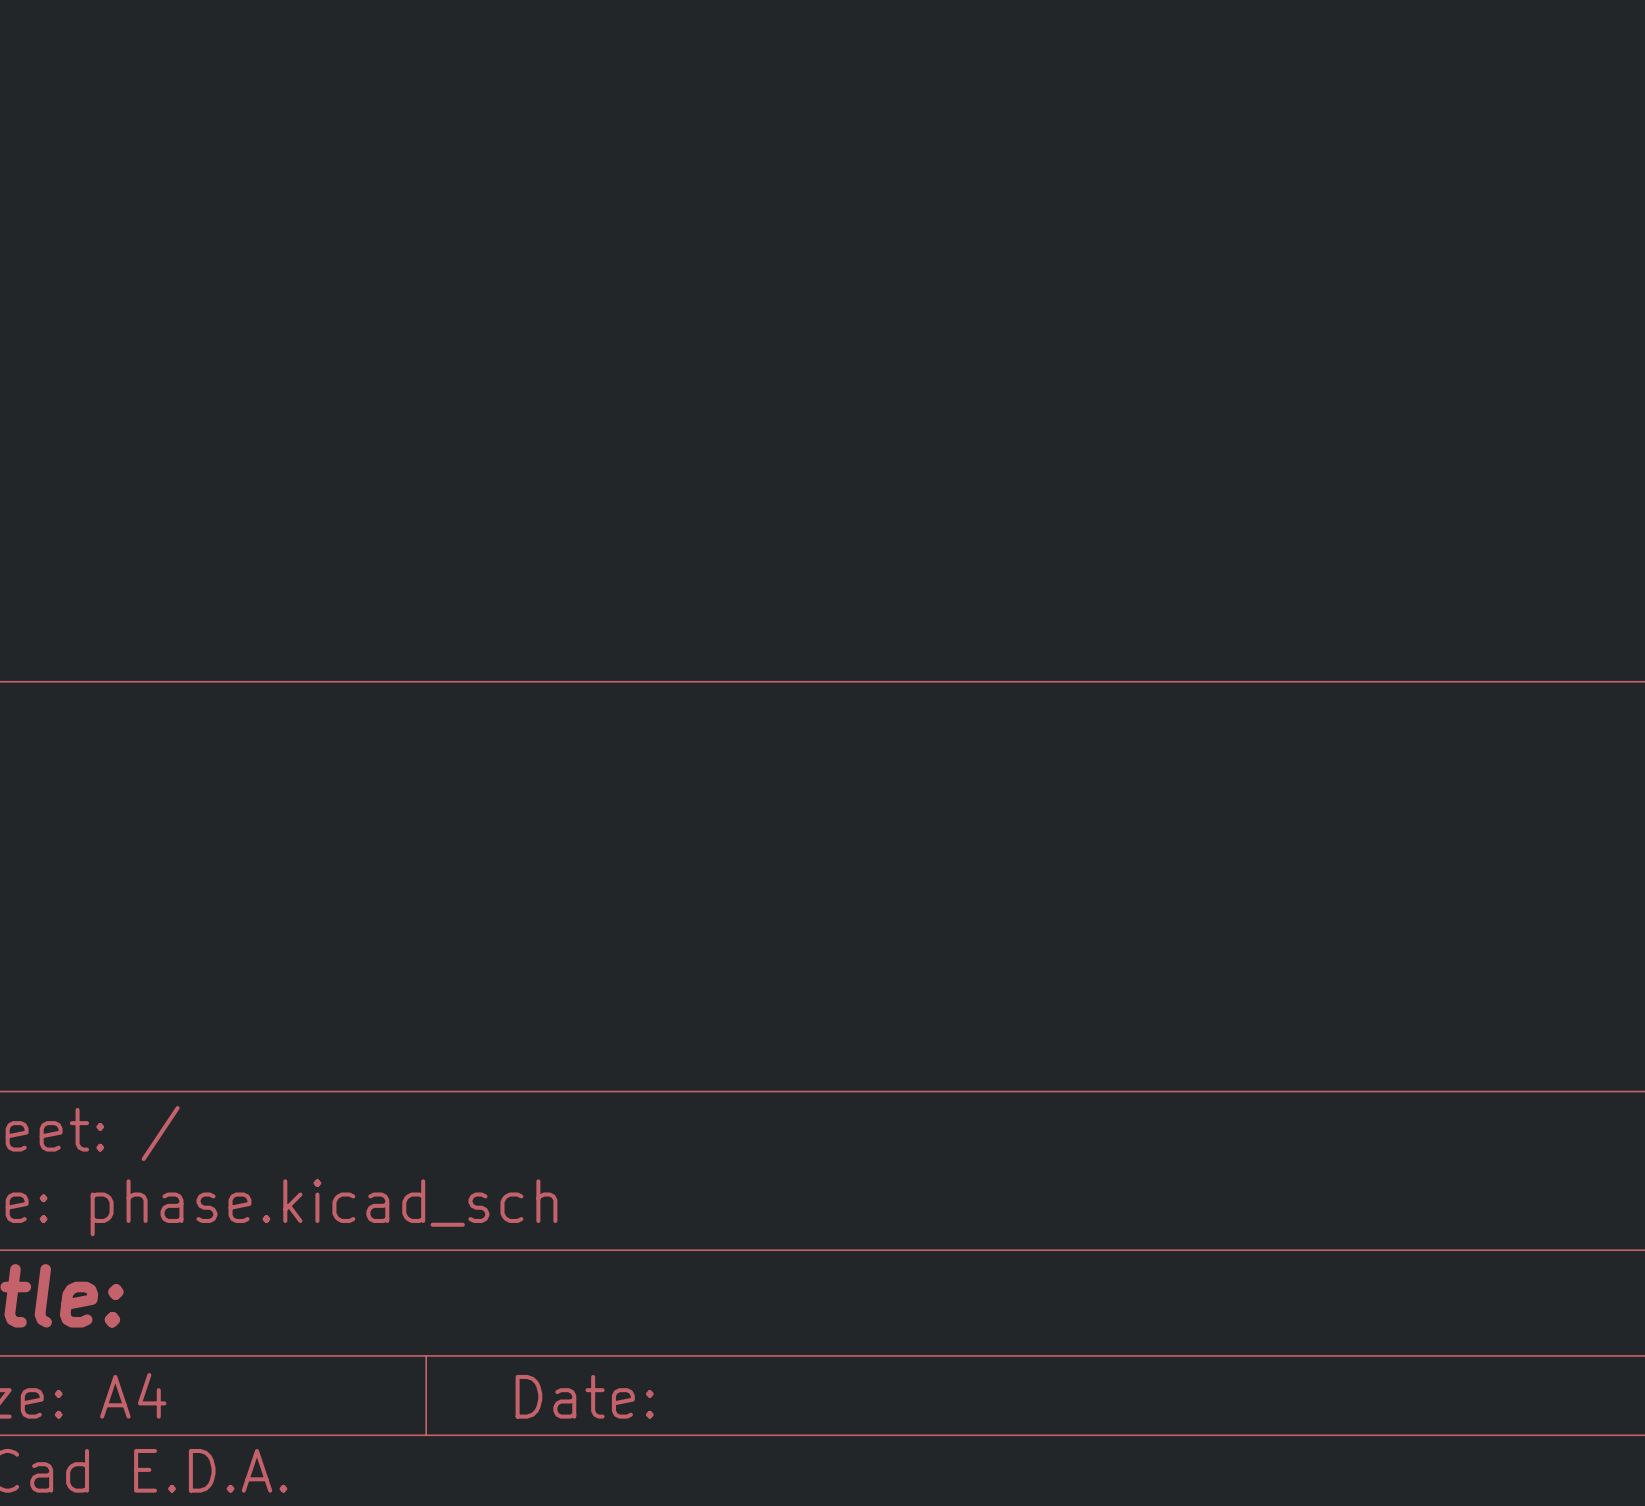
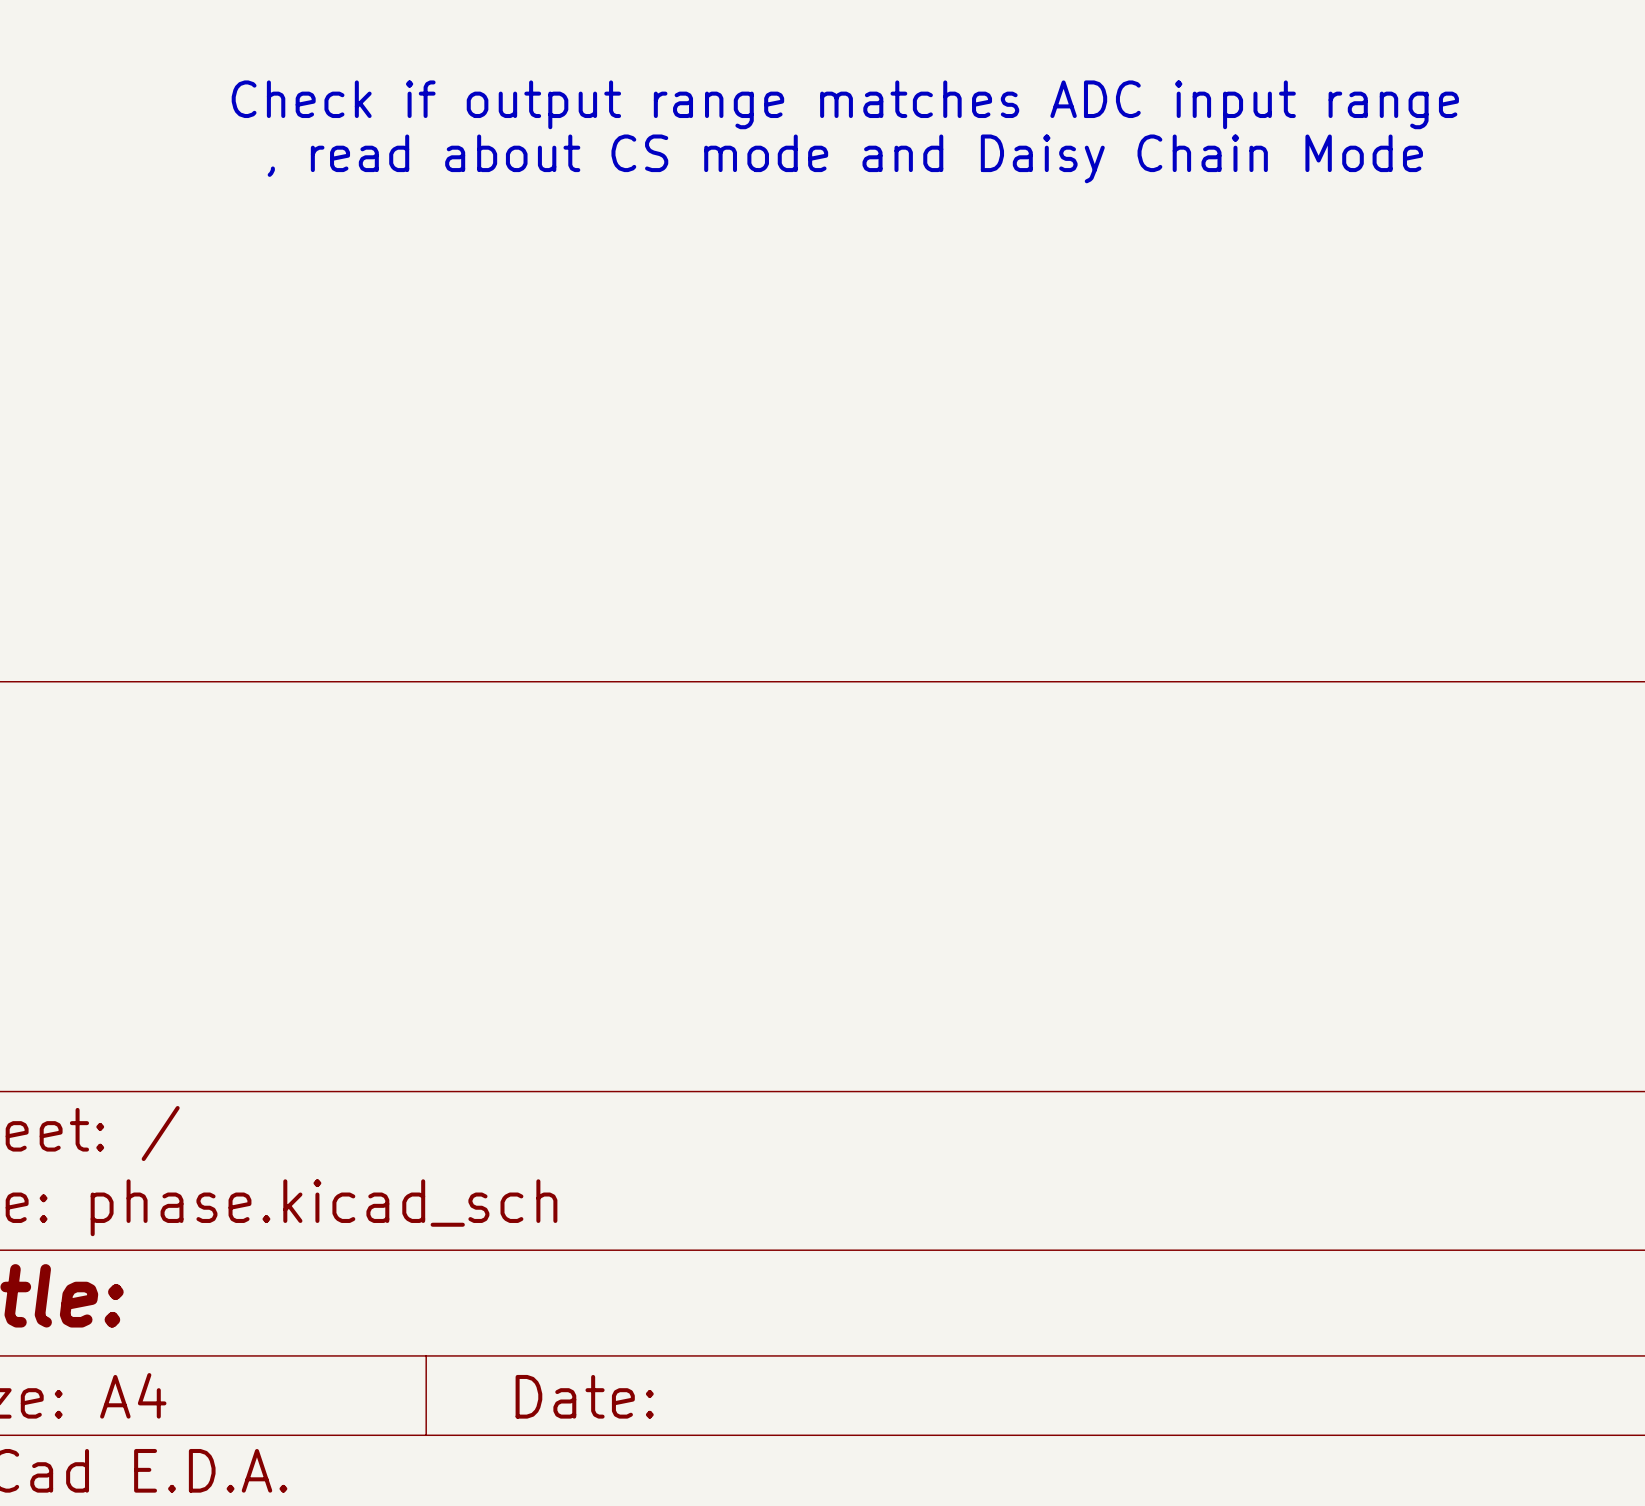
text: none -> Check if output range matches ADC input range (845, 104)
text: none -> , read about CS mode and Daisy Chain Mode (845, 158)

